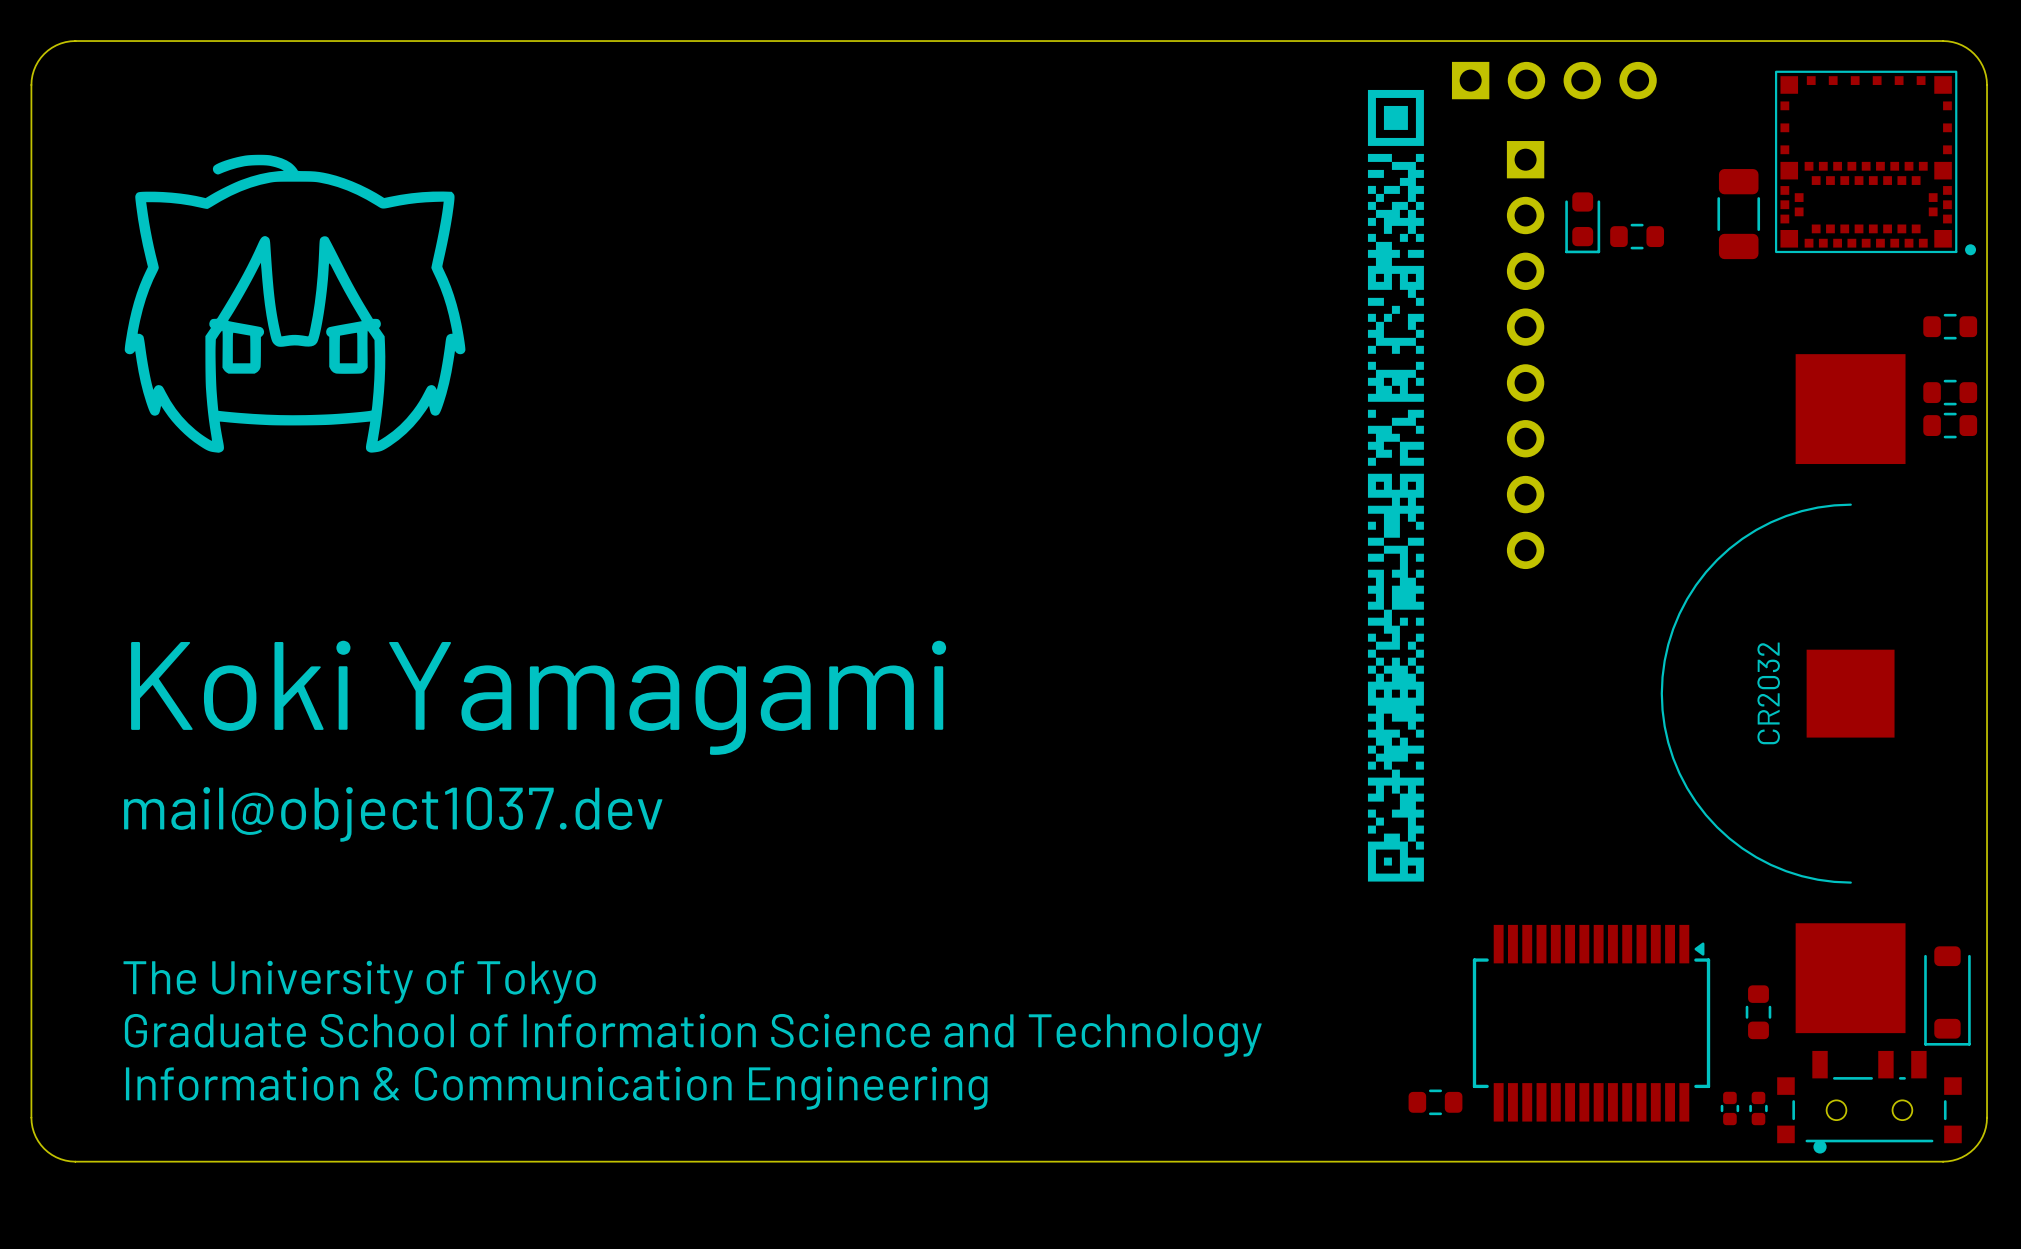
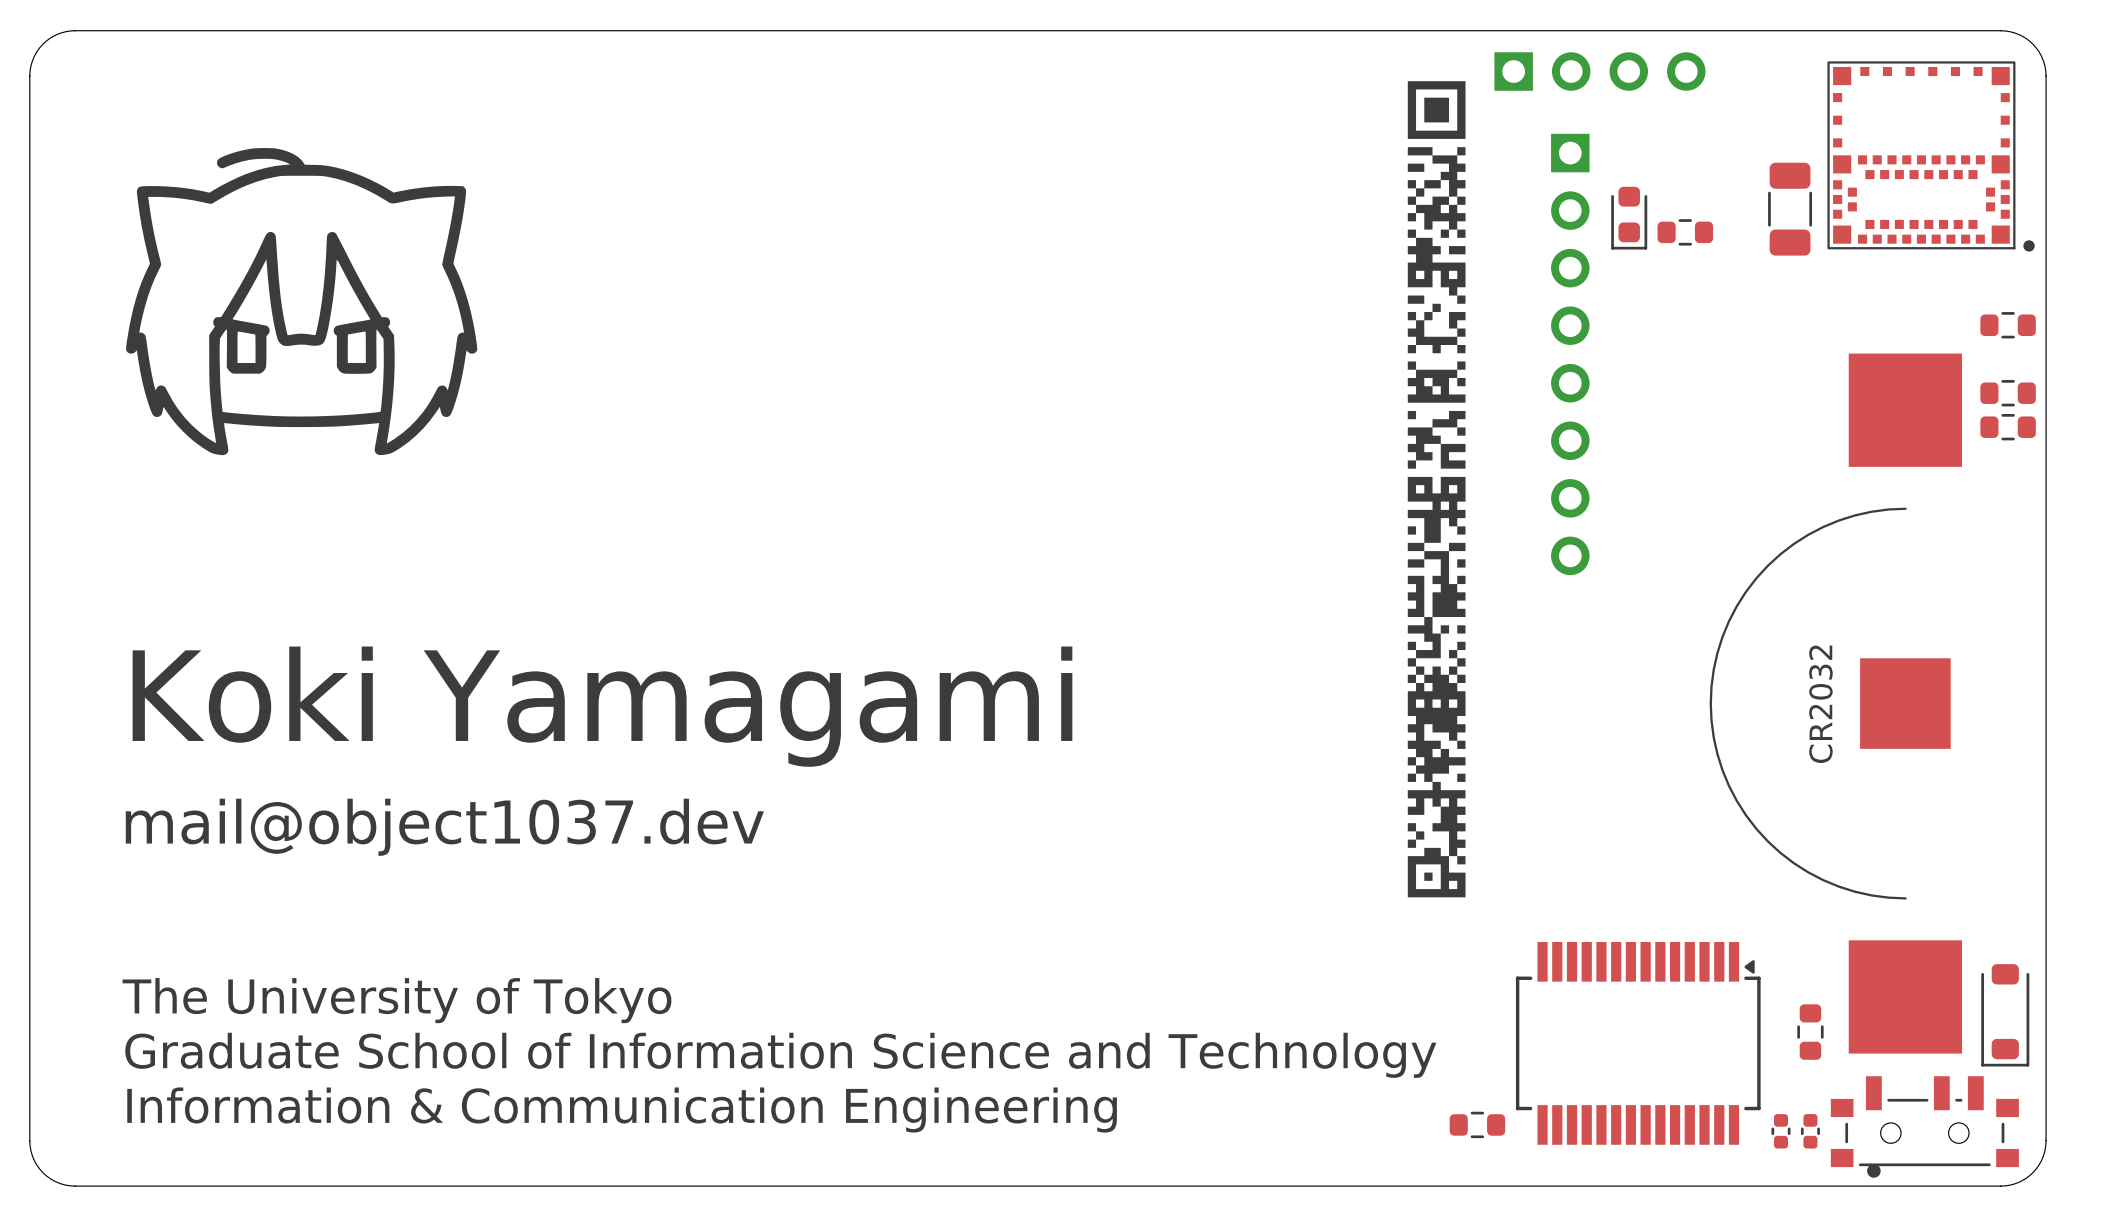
part footprint: [1777, 1050, 1962, 1154] -> [1830, 1076, 2019, 1178]

